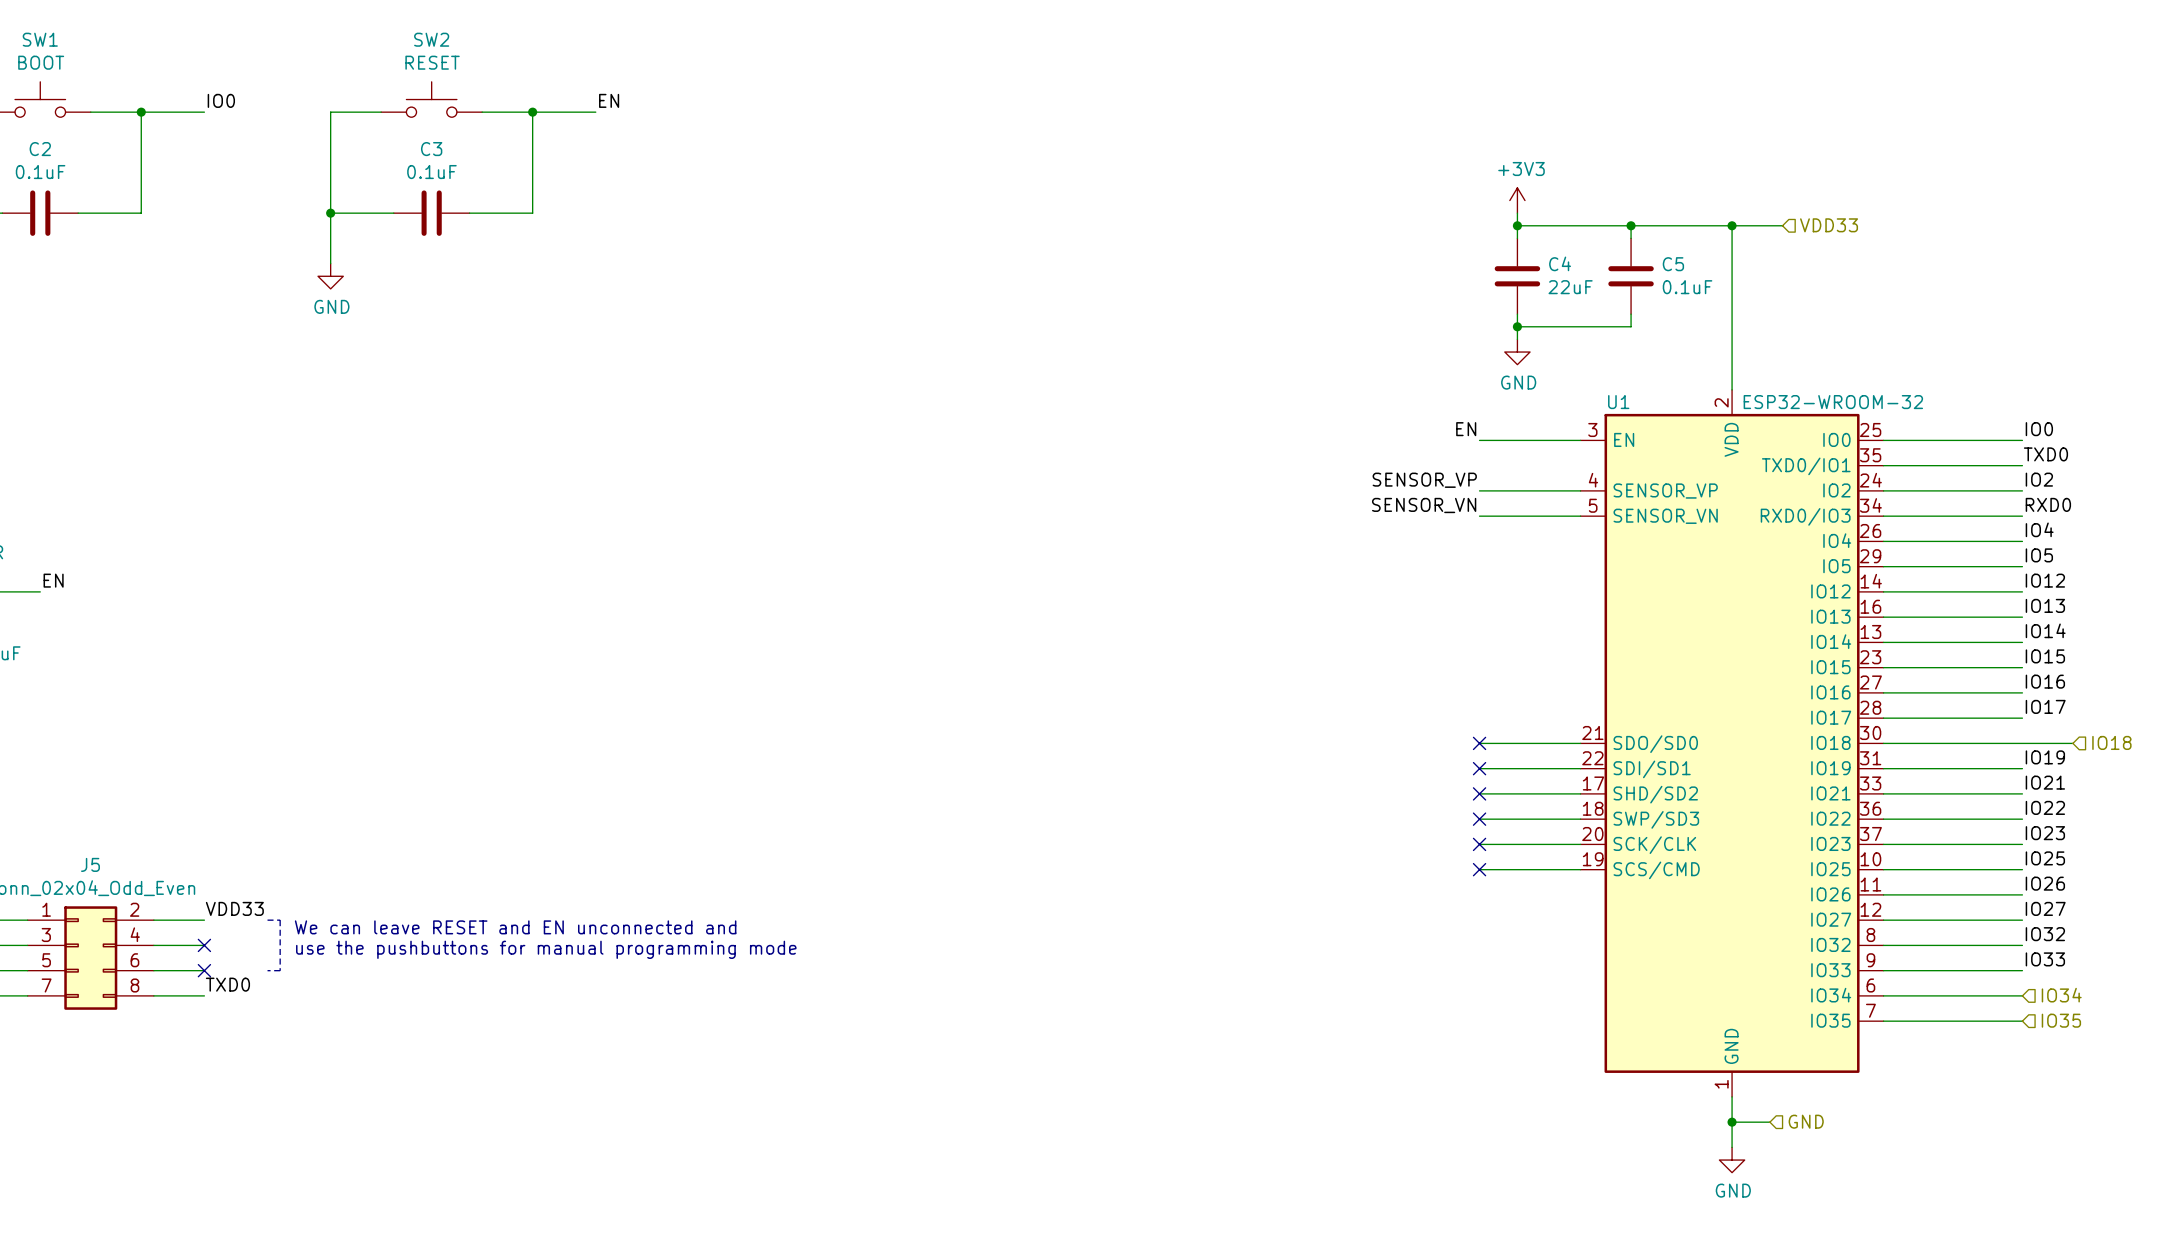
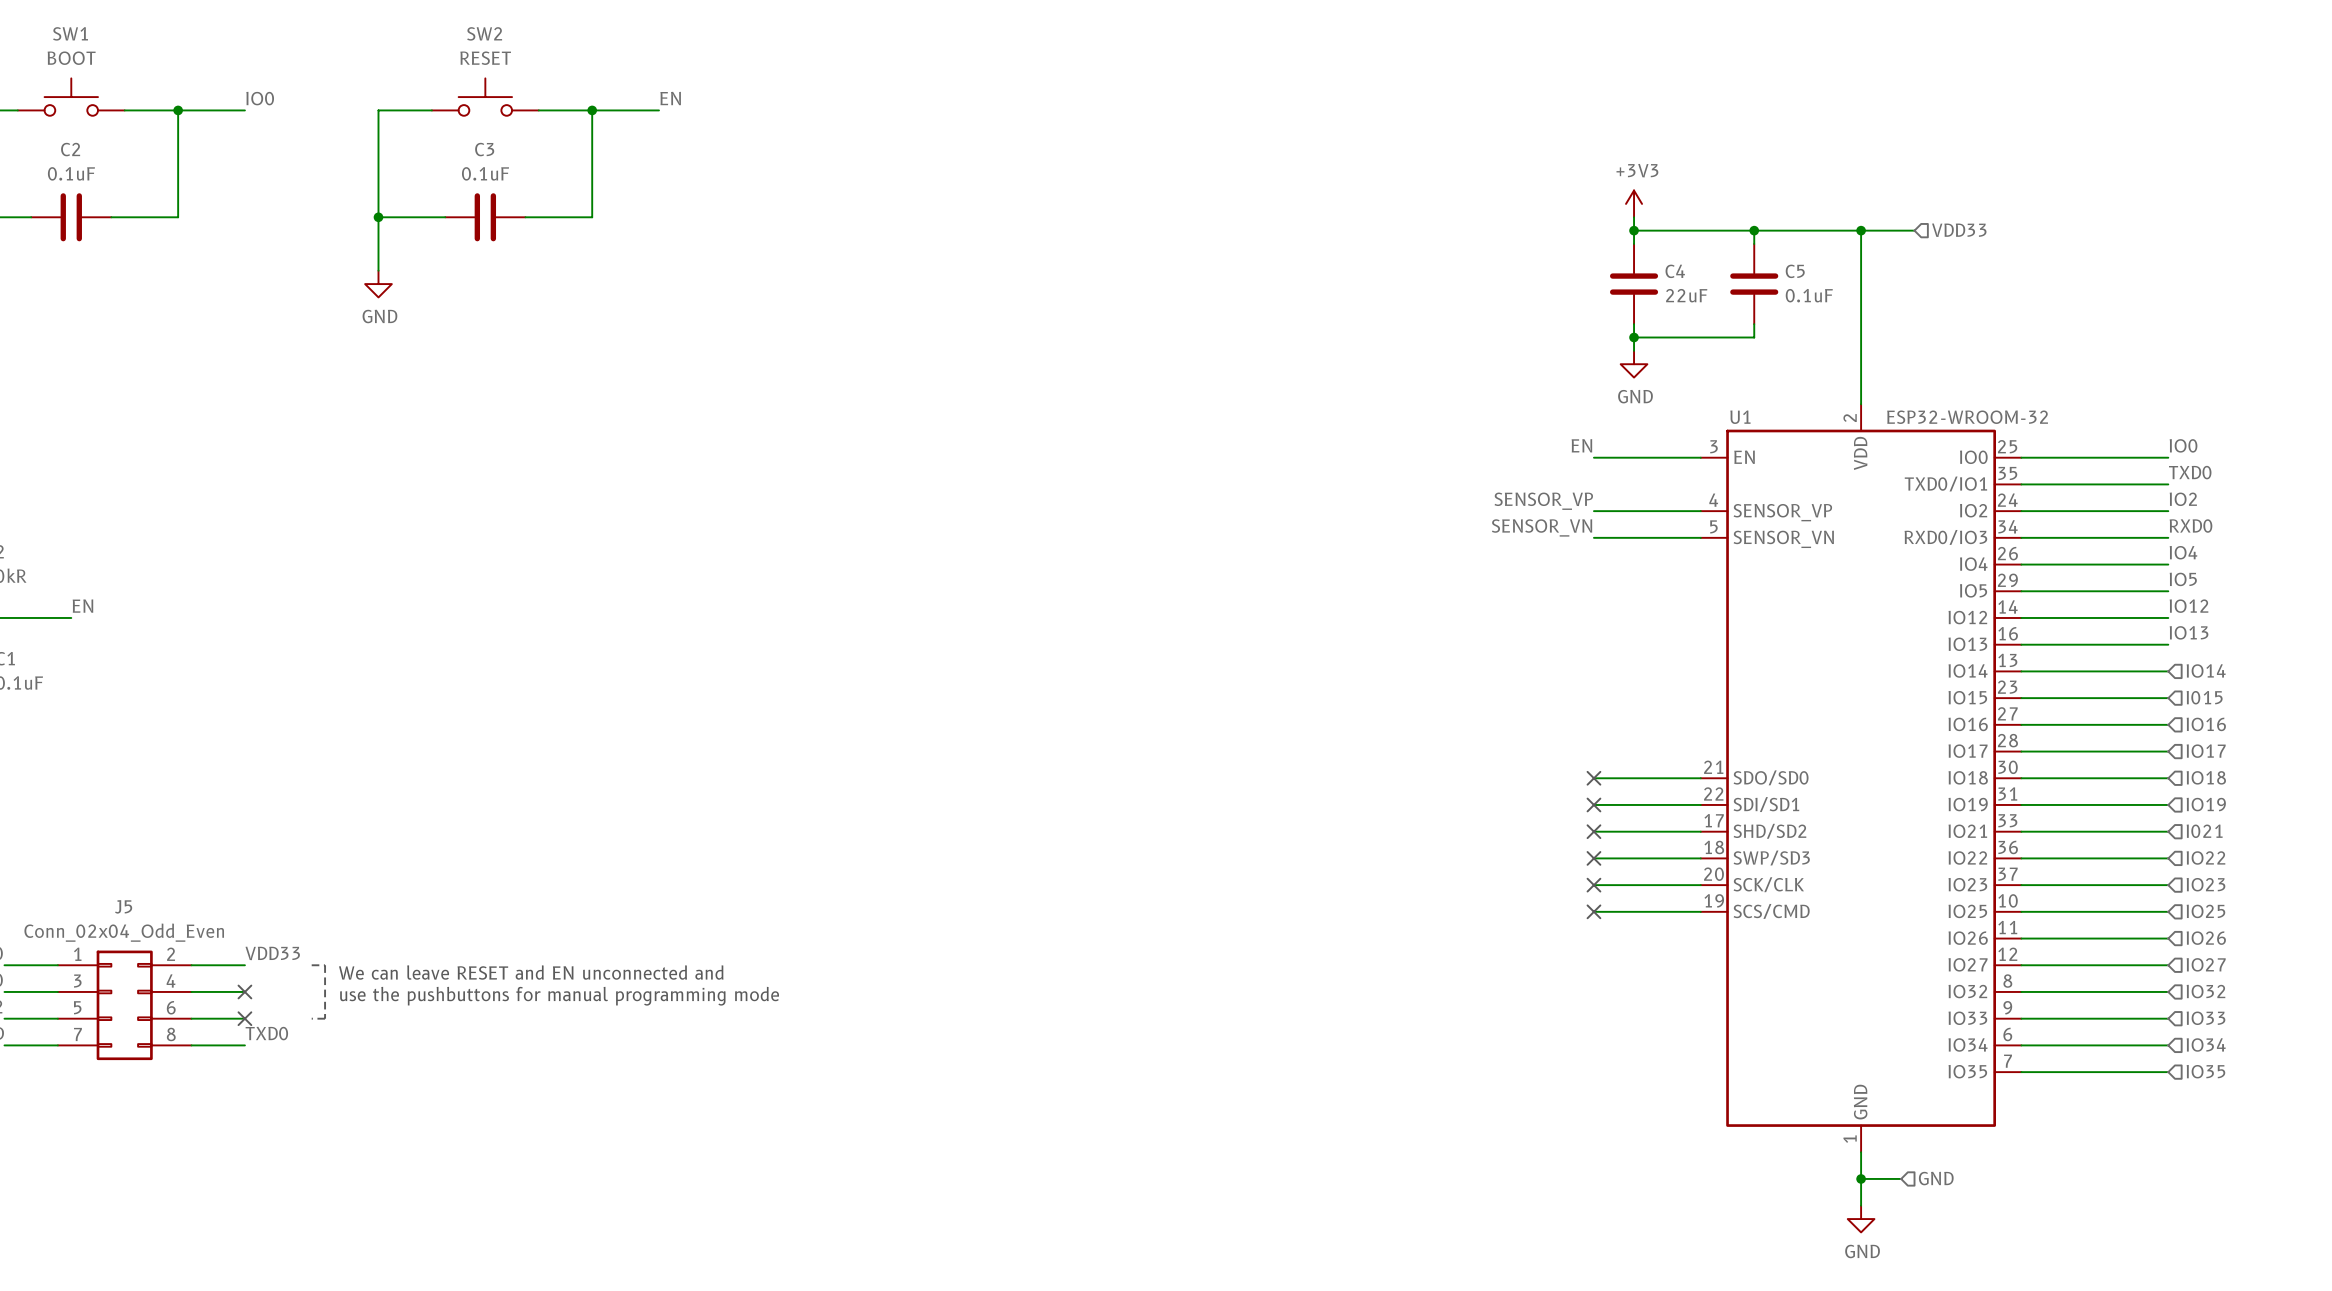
label: IO14 (2045, 630) -> none
hierarchical label: none -> IO14 (2206, 670)
label: IO15 (2045, 656) -> none
hierarchical label: none -> I015 (2204, 697)
label: IO16 (2045, 681) -> none
hierarchical label: none -> IO16 (2206, 724)
label: IO17 (2045, 706) -> none
hierarchical label: none -> IO17 (2206, 751)
hierarchical label position: IO18 (2111, 742) -> IO18 (2206, 777)
wire: (2022, 743) (2072, 743) -> none
label: IO19 (2045, 757) -> none
hierarchical label: none -> IO19 (2206, 804)
label: IO21 (2045, 782) -> none
hierarchical label: none -> I021 (2204, 831)
label: IO22 (2045, 807) -> none
hierarchical label: none -> IO22 (2205, 857)
label: IO23 (2045, 833) -> none
hierarchical label: none -> IO23 (2205, 884)
label: IO25 (2045, 858) -> none
hierarchical label: none -> IO25 (2205, 911)
label: IO26 (2045, 883) -> none
hierarchical label: none -> IO26 (2206, 938)
label: IO27 (2045, 908) -> none
hierarchical label: none -> IO27 (2206, 964)
label: IO32 (2045, 934) -> none
hierarchical label: none -> IO32 (2205, 991)
label: IO33 (2045, 959) -> none
hierarchical label: none -> IO33 (2205, 1018)

